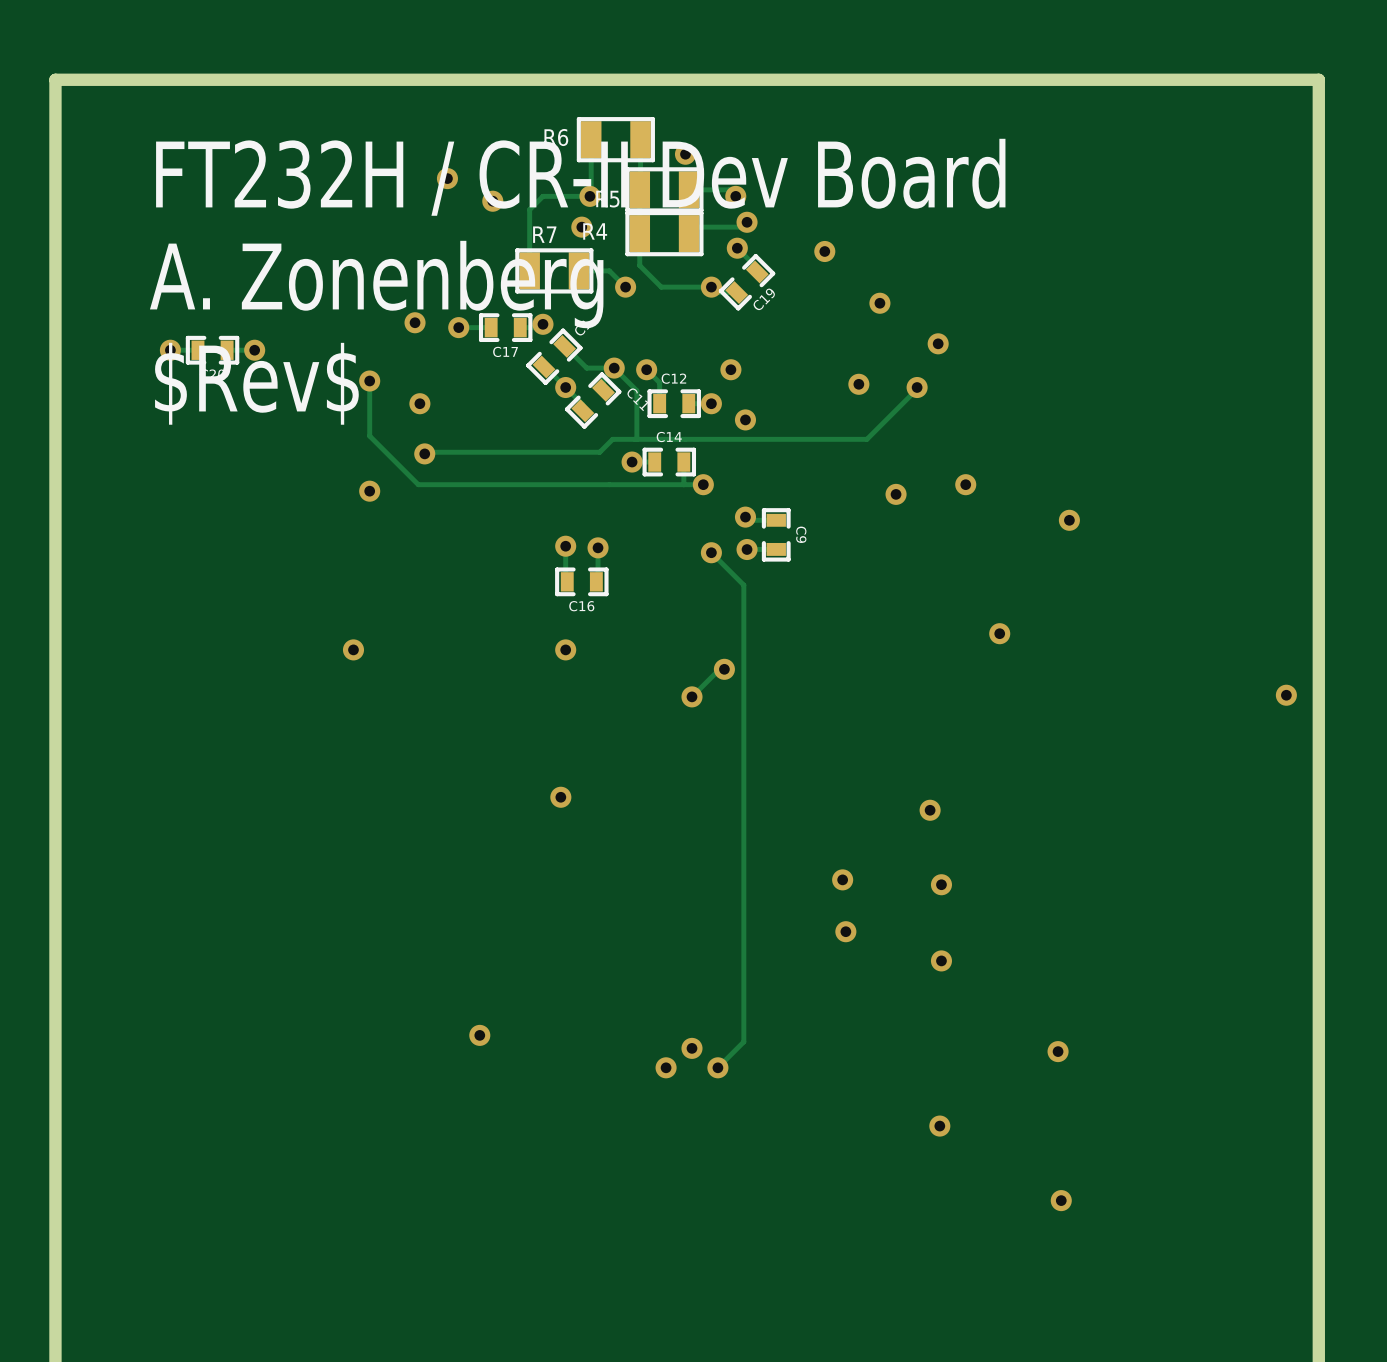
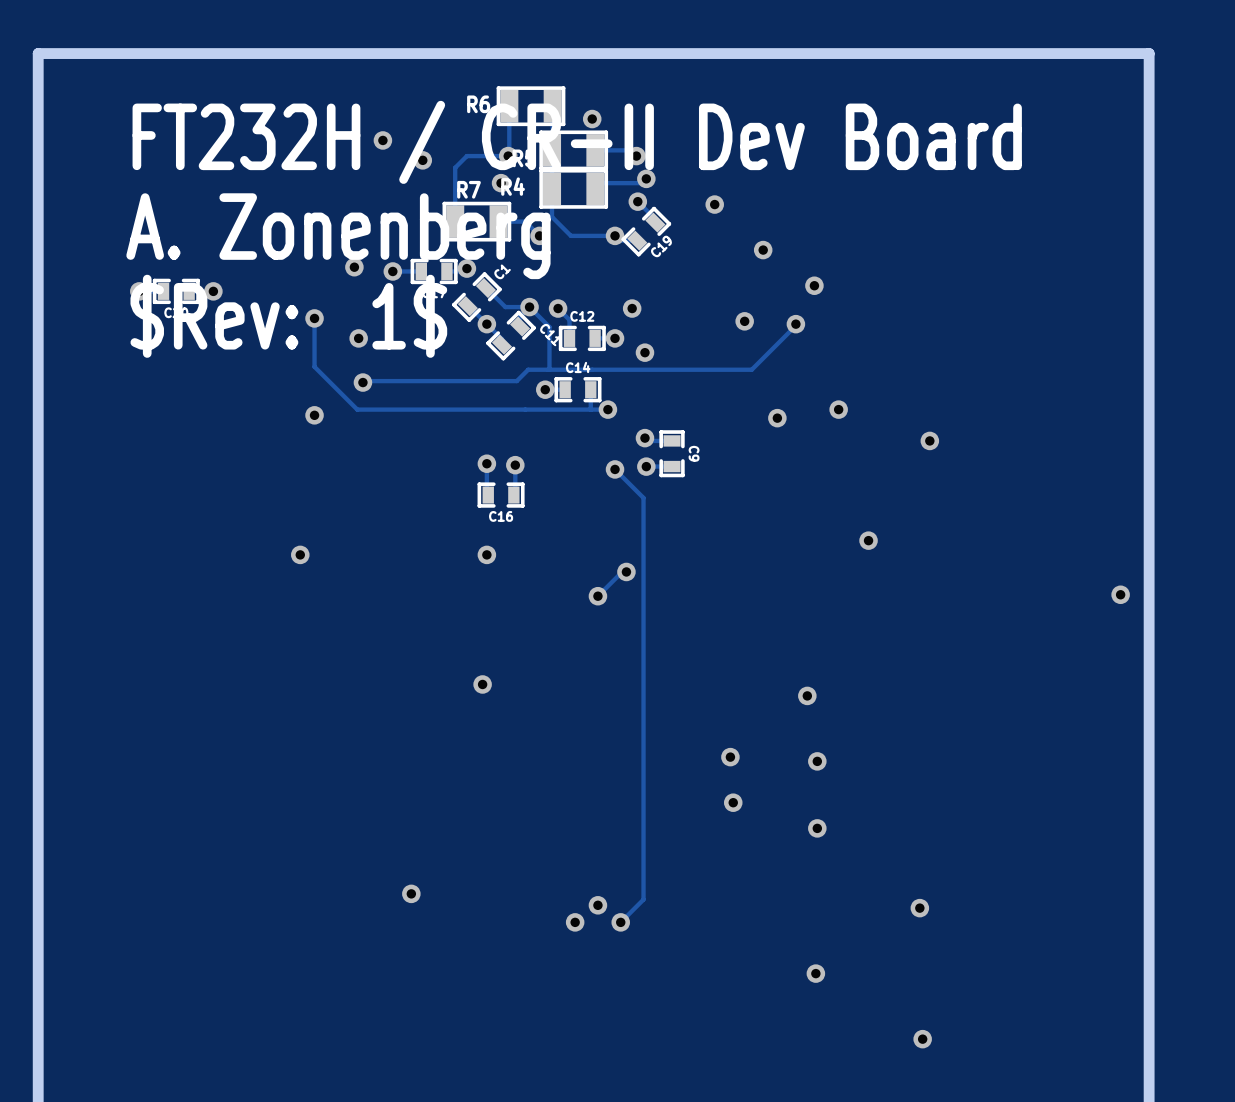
text: $Rev$ (256, 383) -> $Rev: 1$ (288, 316)

